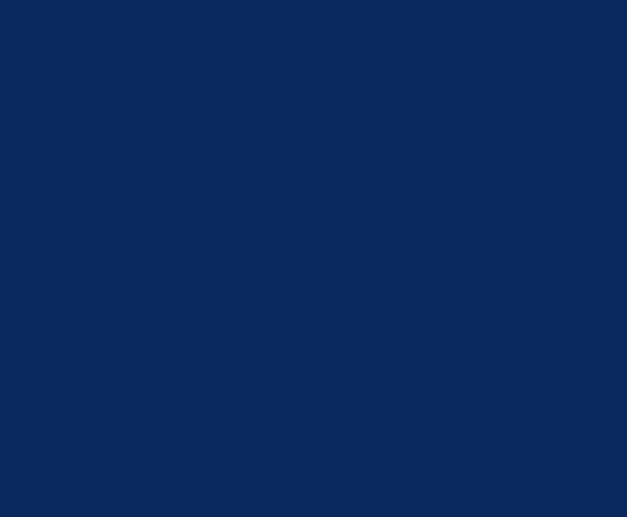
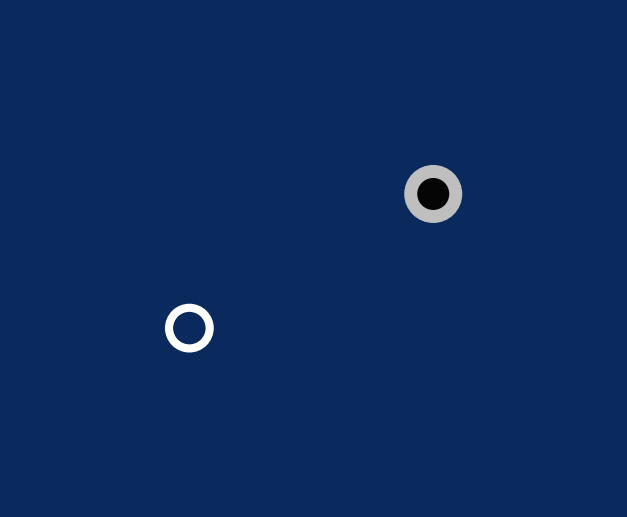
via: none -> (433, 193)
part: none -> (189, 328)

